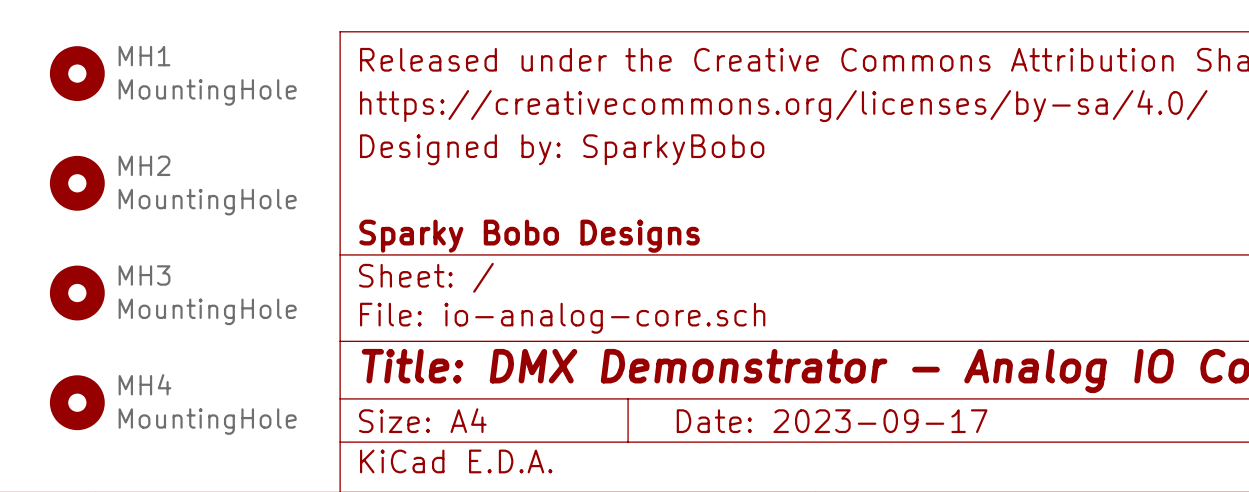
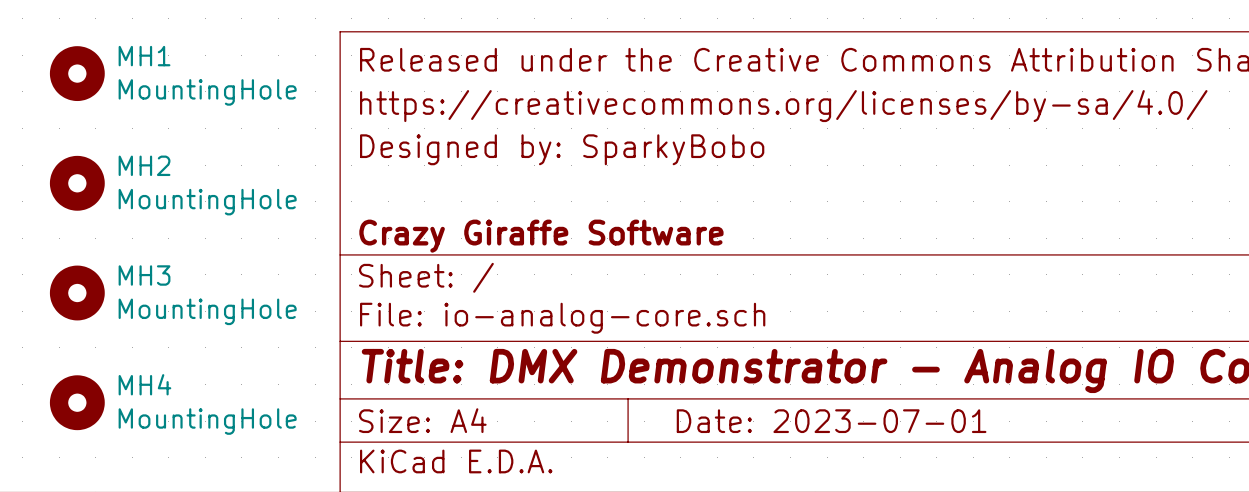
title block: Sparky Bobo Designs (529, 236) -> Crazy Giraffe Software (541, 236)
title block: Date: 2023-09-17 (832, 421) -> Date: 2023-07-01 (831, 421)

